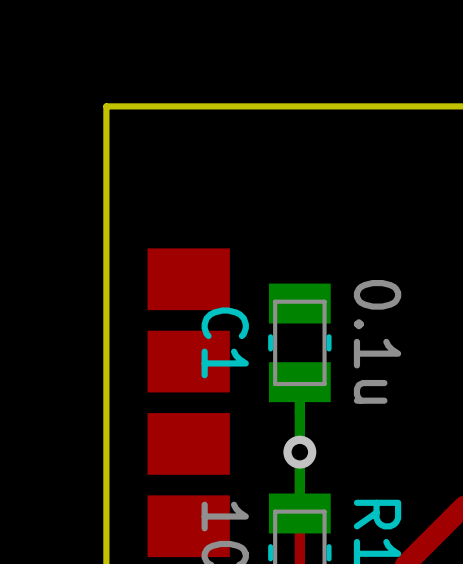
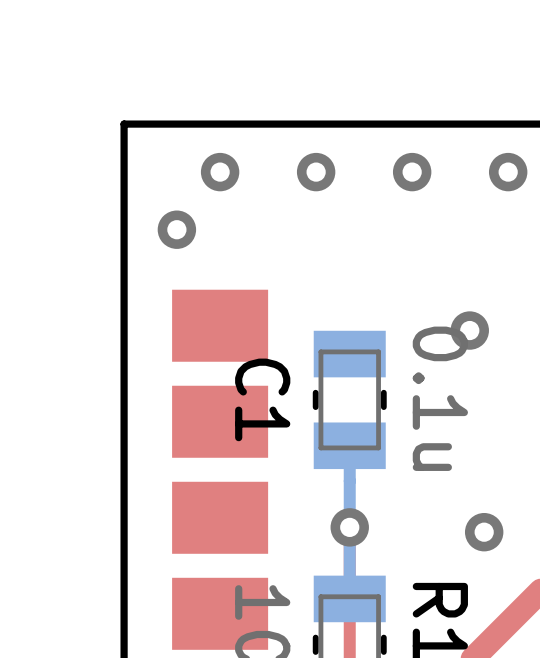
via: none -> (220, 172)
via: none -> (316, 172)
via: none -> (412, 172)
via: none -> (508, 172)
via: none -> (176, 229)
via: none -> (469, 330)
via: none -> (484, 532)

